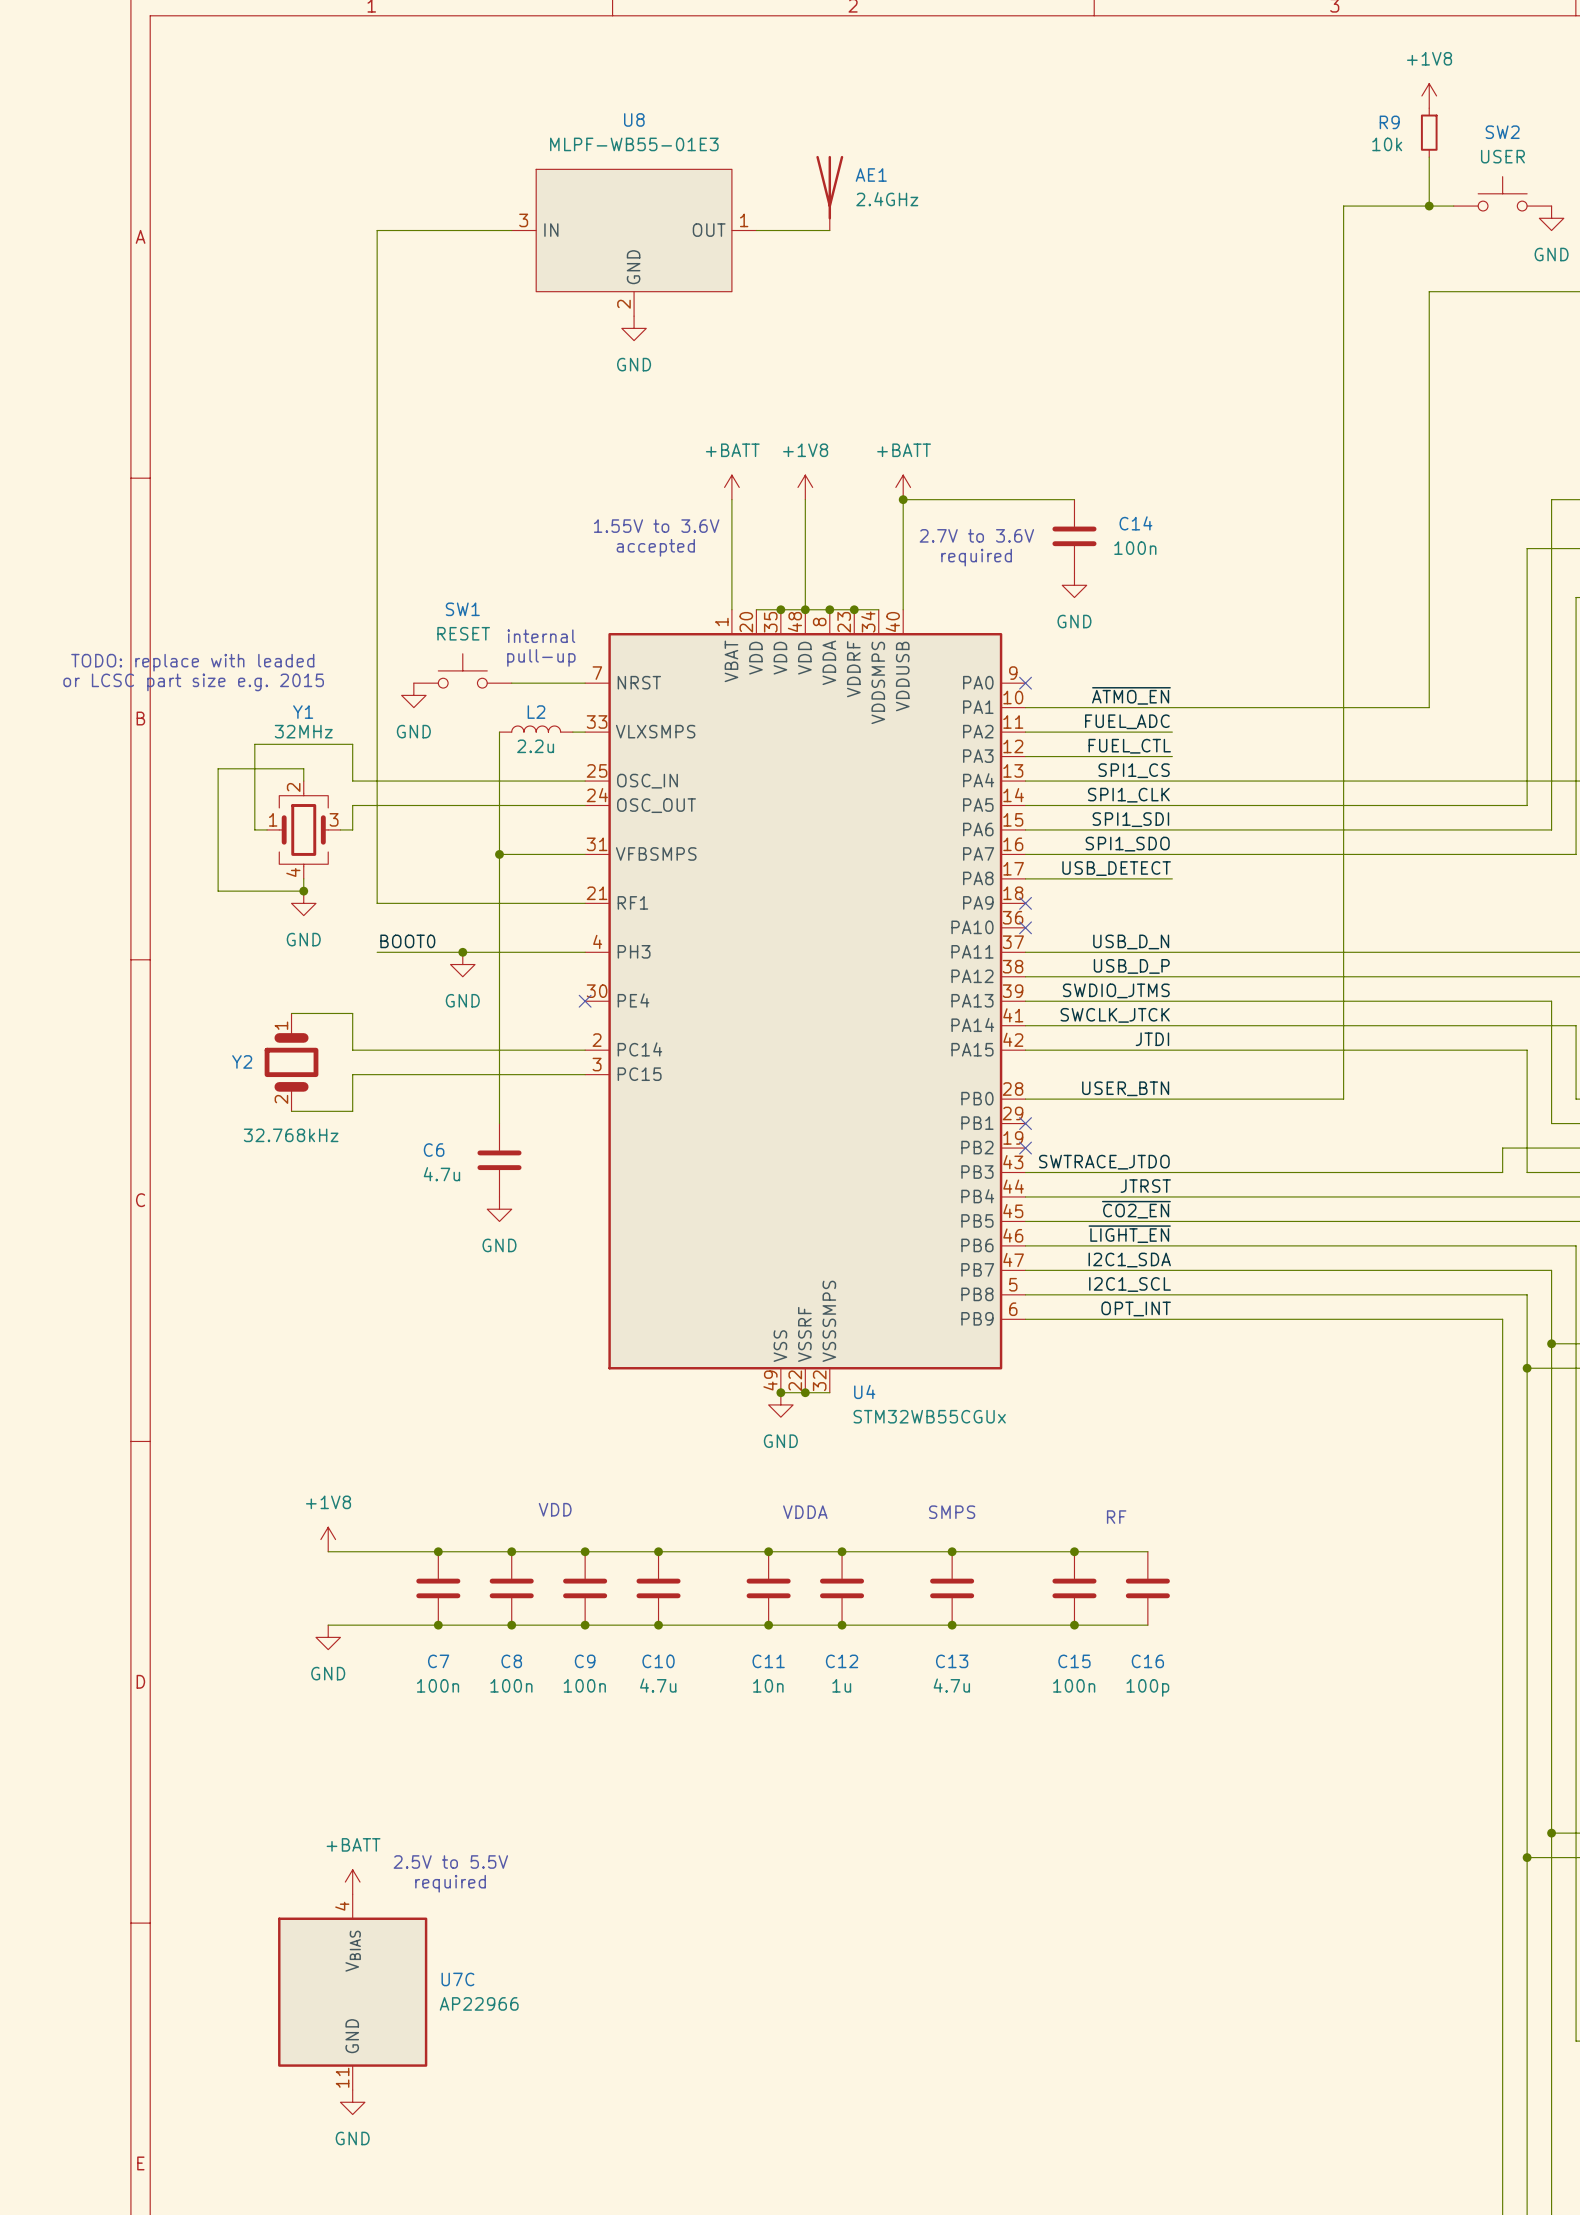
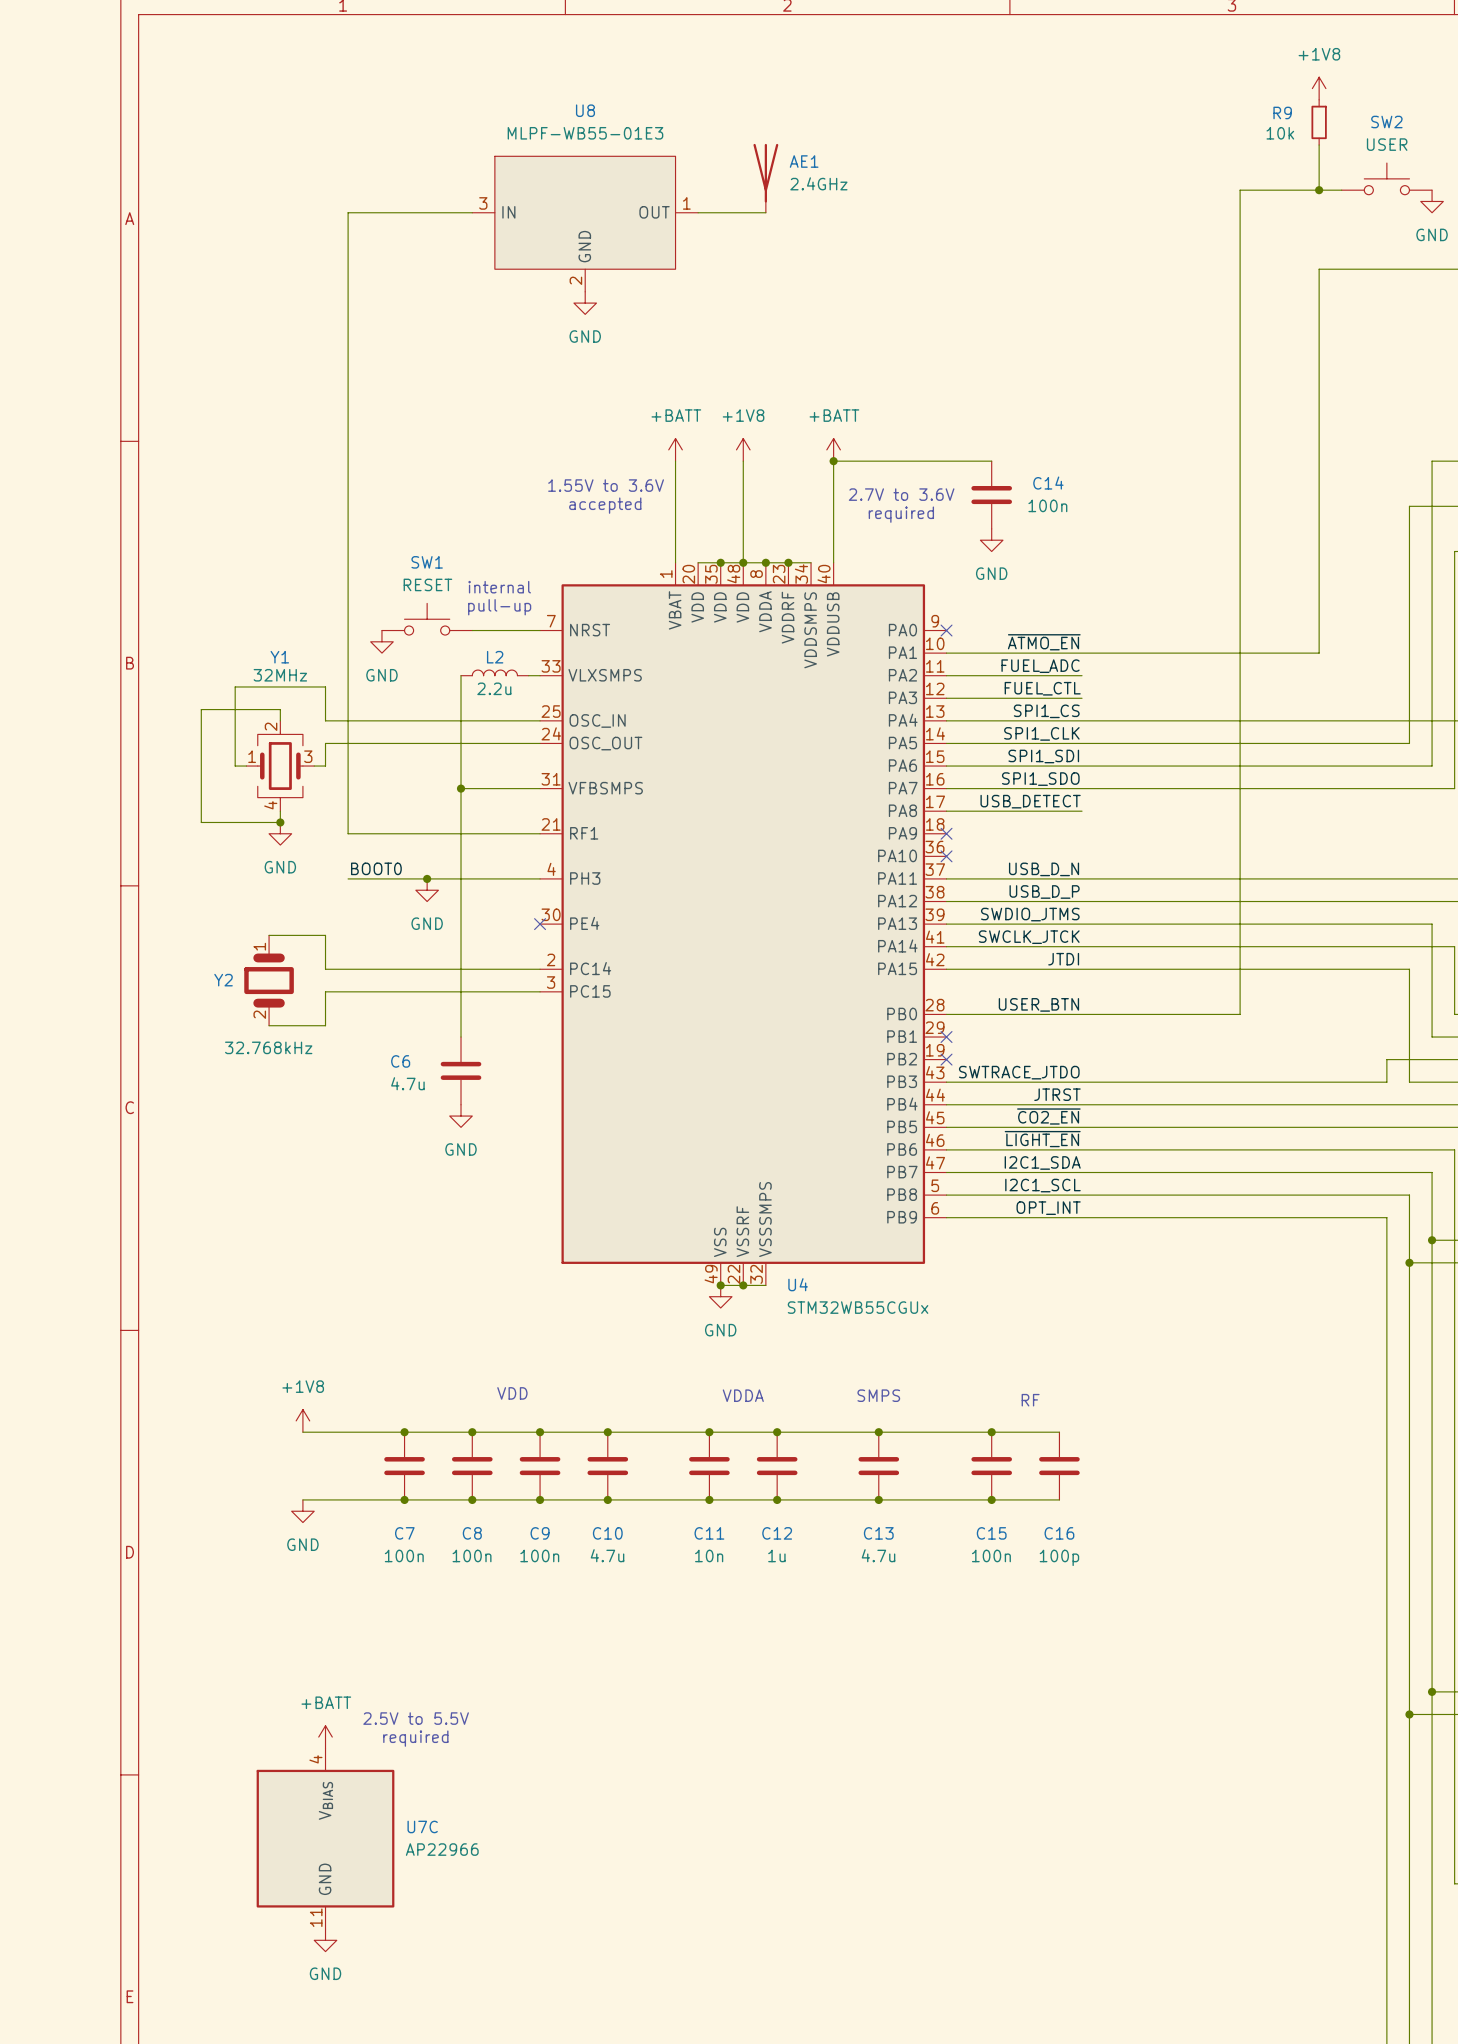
text: TODO: replace with leaded (192, 662) -> none
text: or LCSC part size e.g. 2015 (193, 682) -> none

